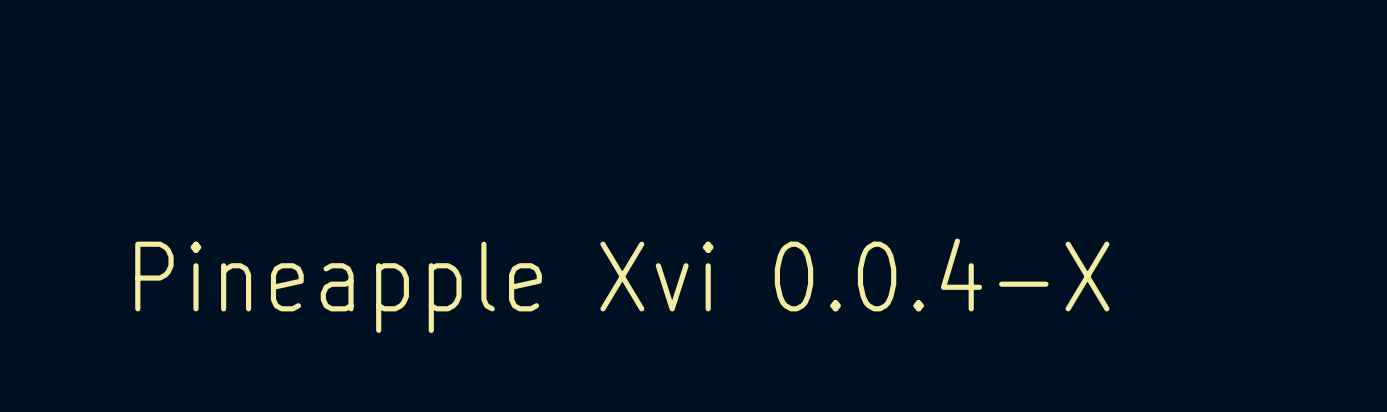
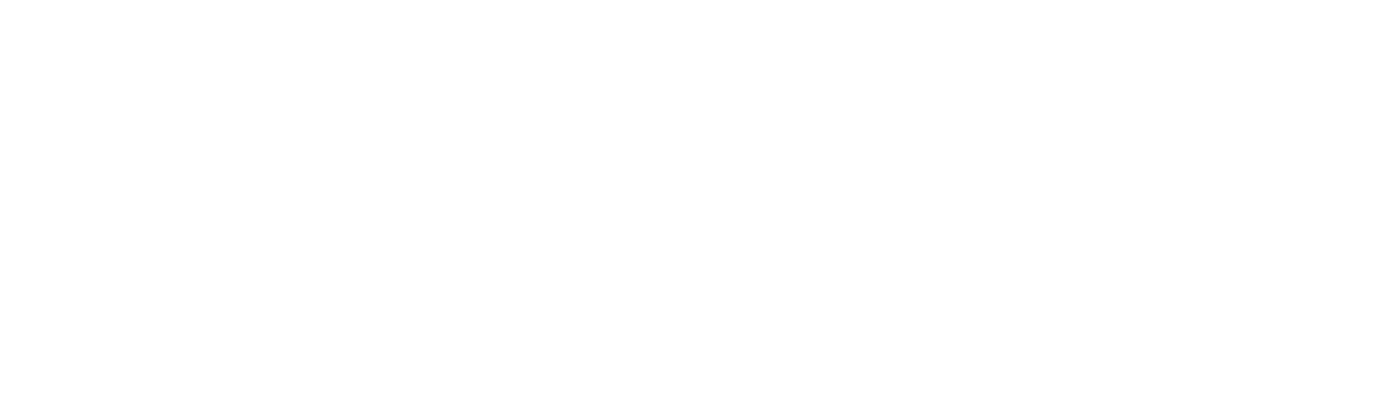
text: Pineapple Xvi 0.0.4-X (622, 285) -> none

